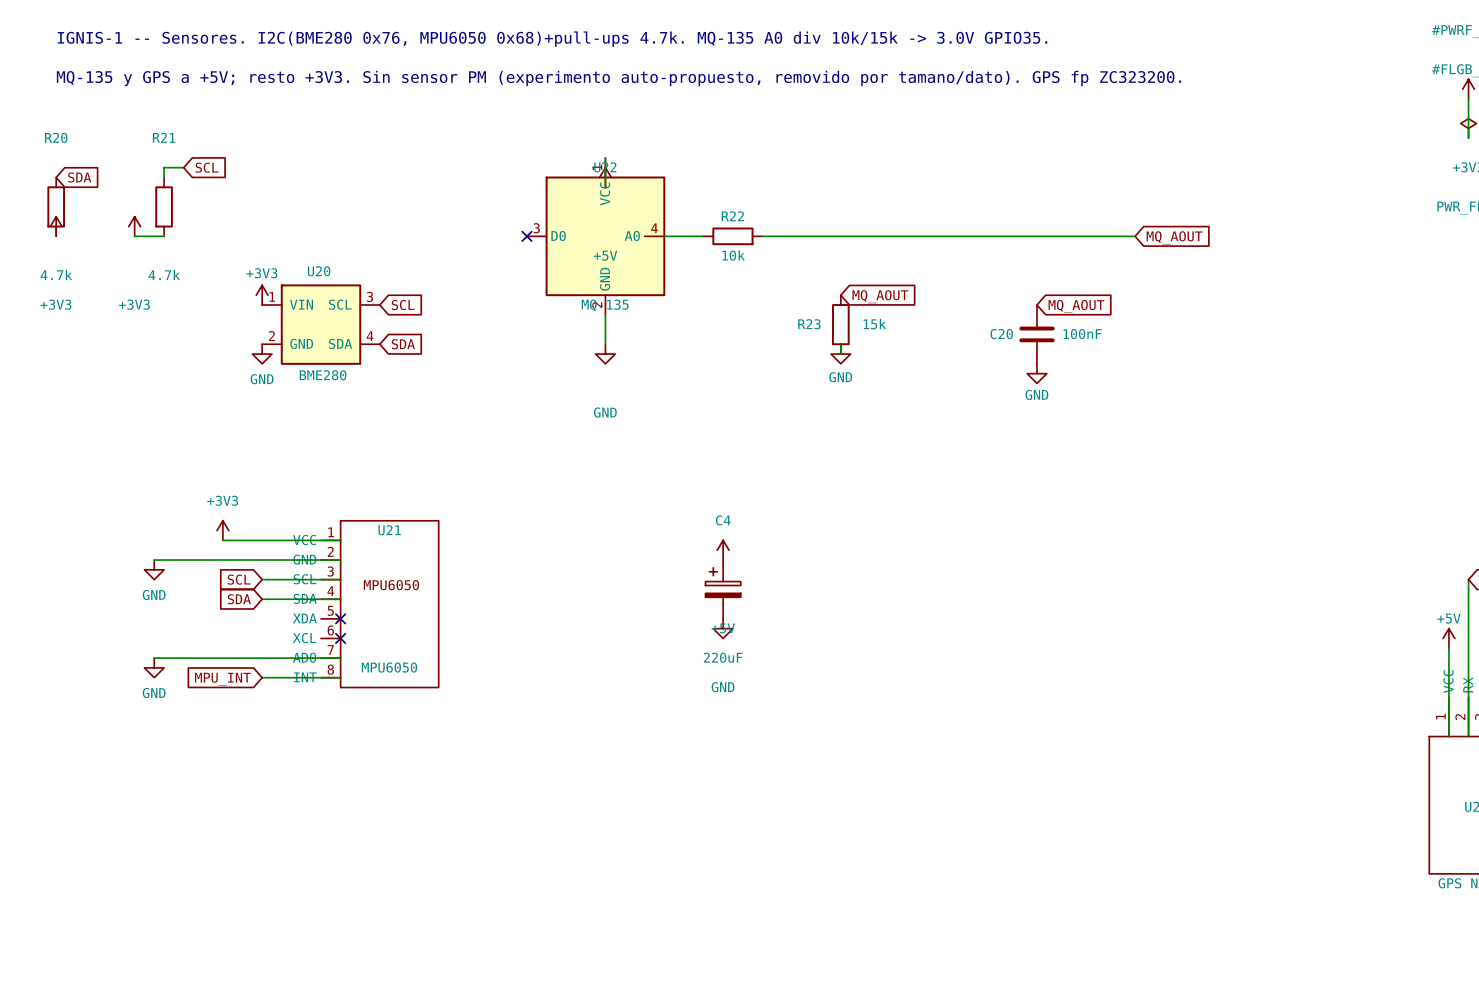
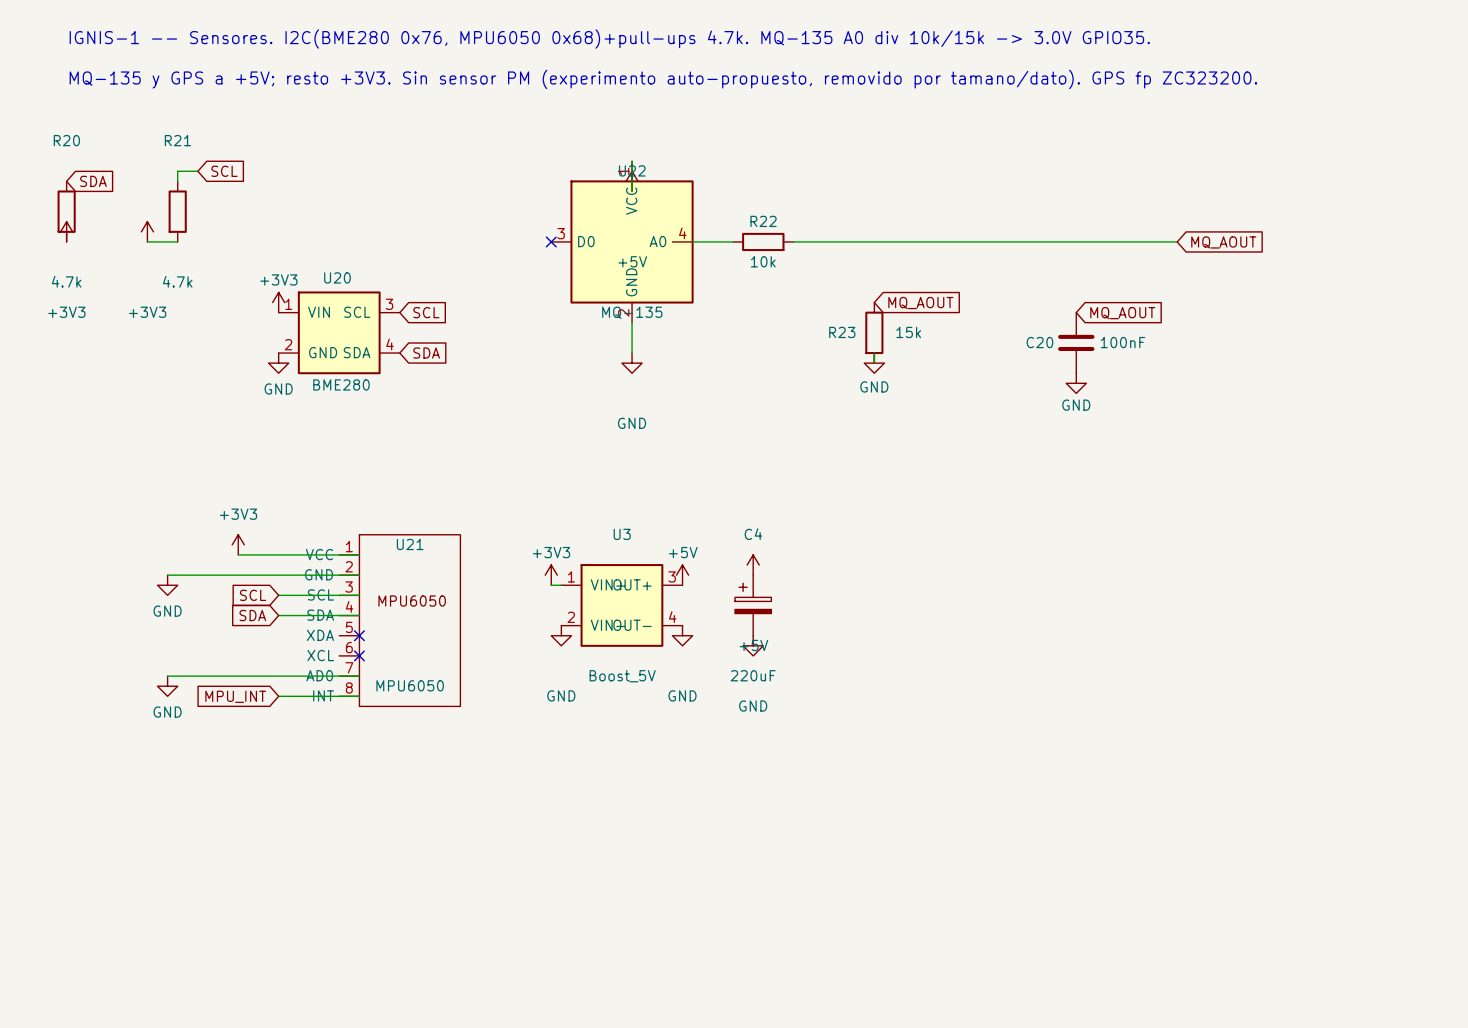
power symbol: none -> +3V3 (551, 575)
power symbol: none -> +5V (682, 575)
wire: none -> (551, 585) (561, 585)
U3: none -> Boost_5V (621, 605)
power symbol: none -> GND (561, 635)
power symbol: none -> GND (682, 635)

